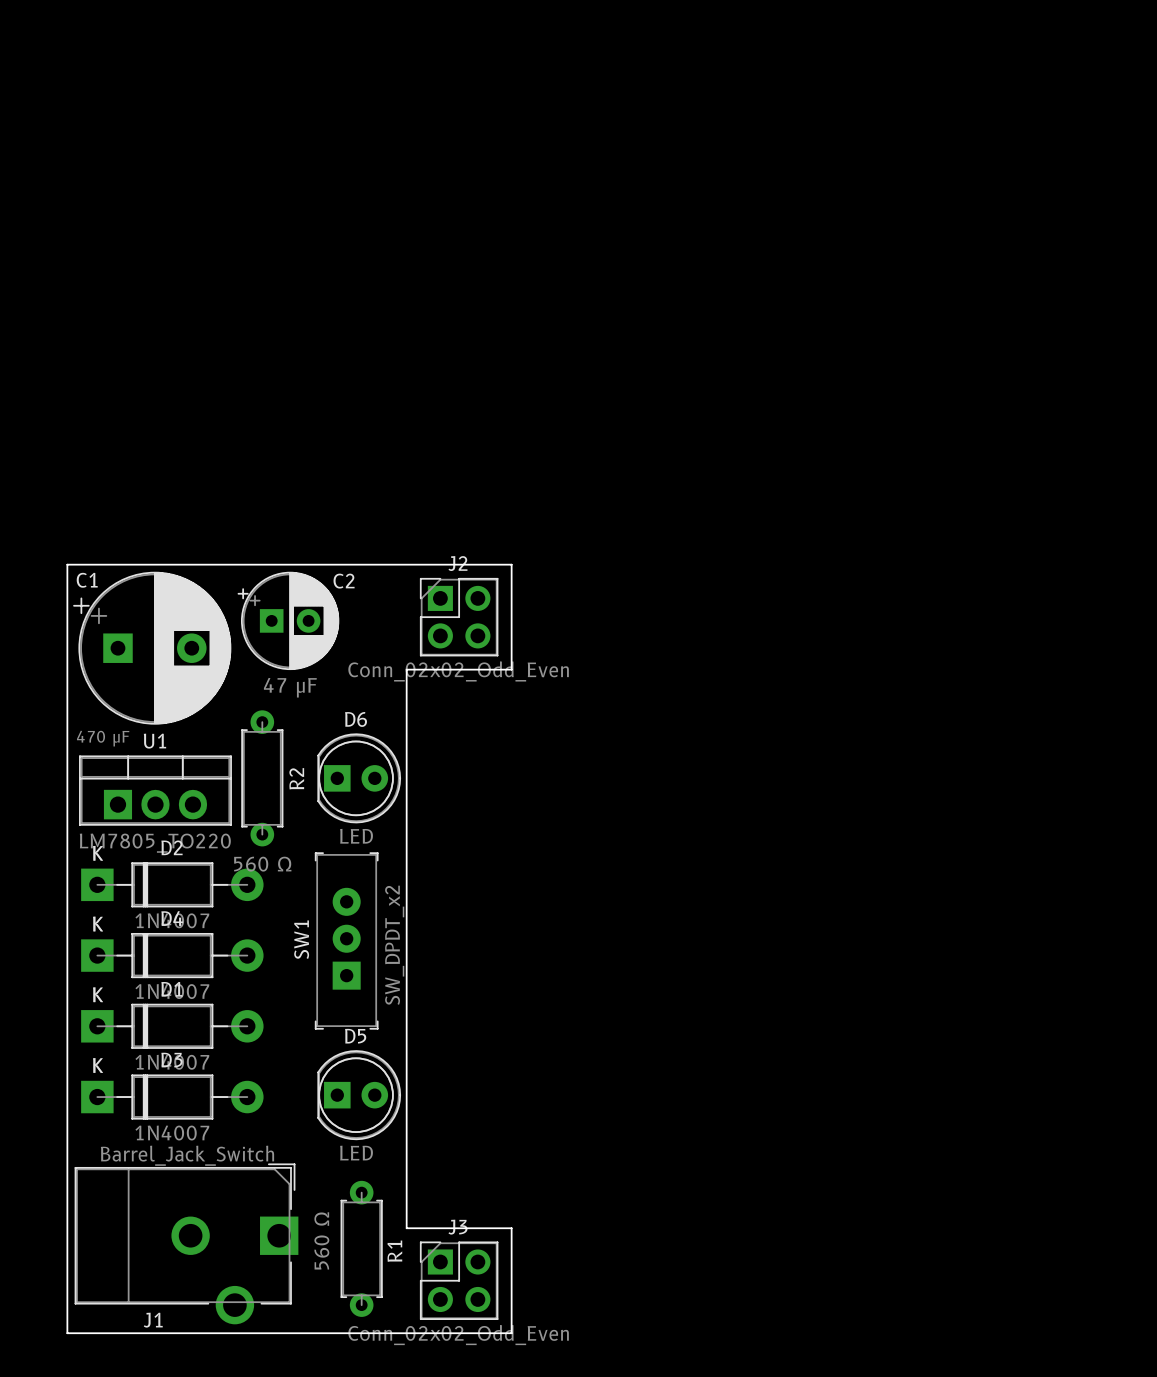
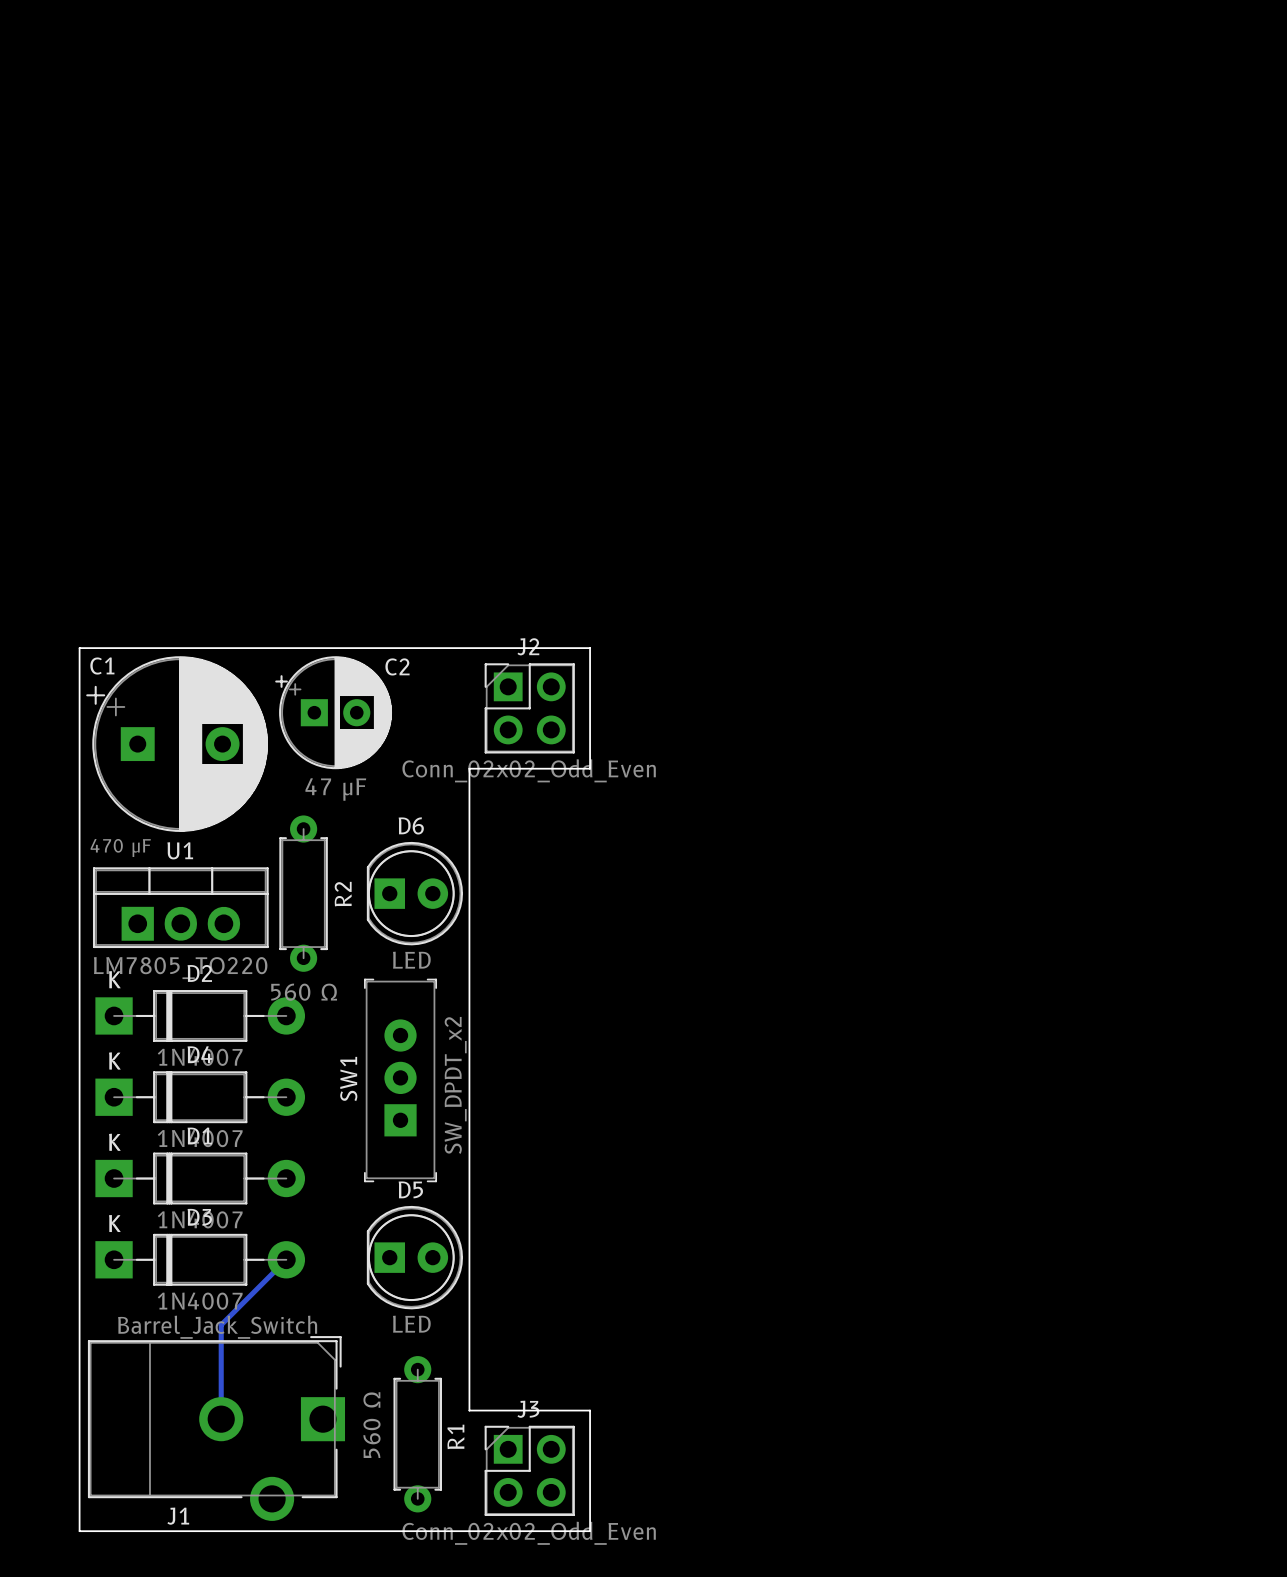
bottom track: none -> (286, 1259) (221, 1324) (221, 1419)

